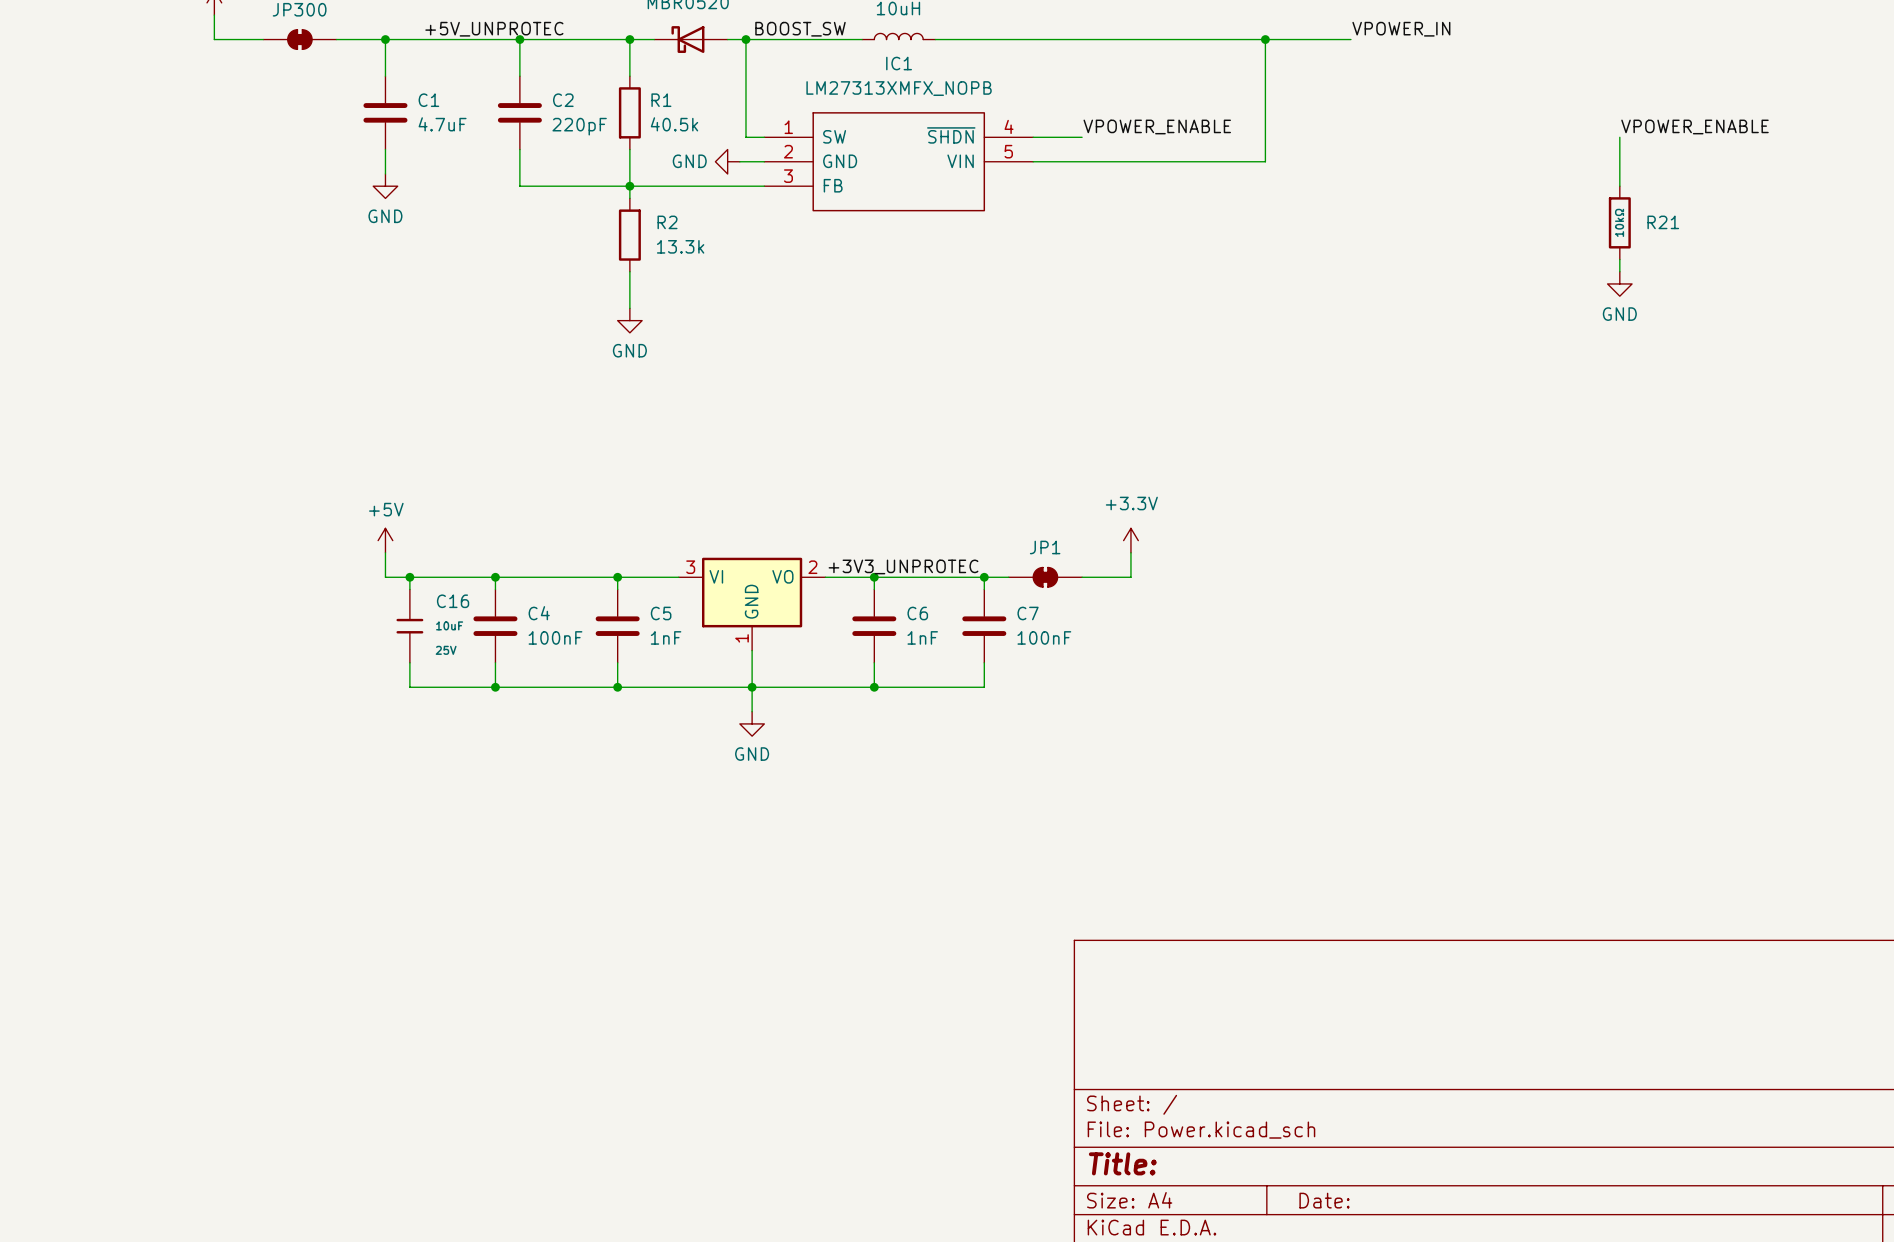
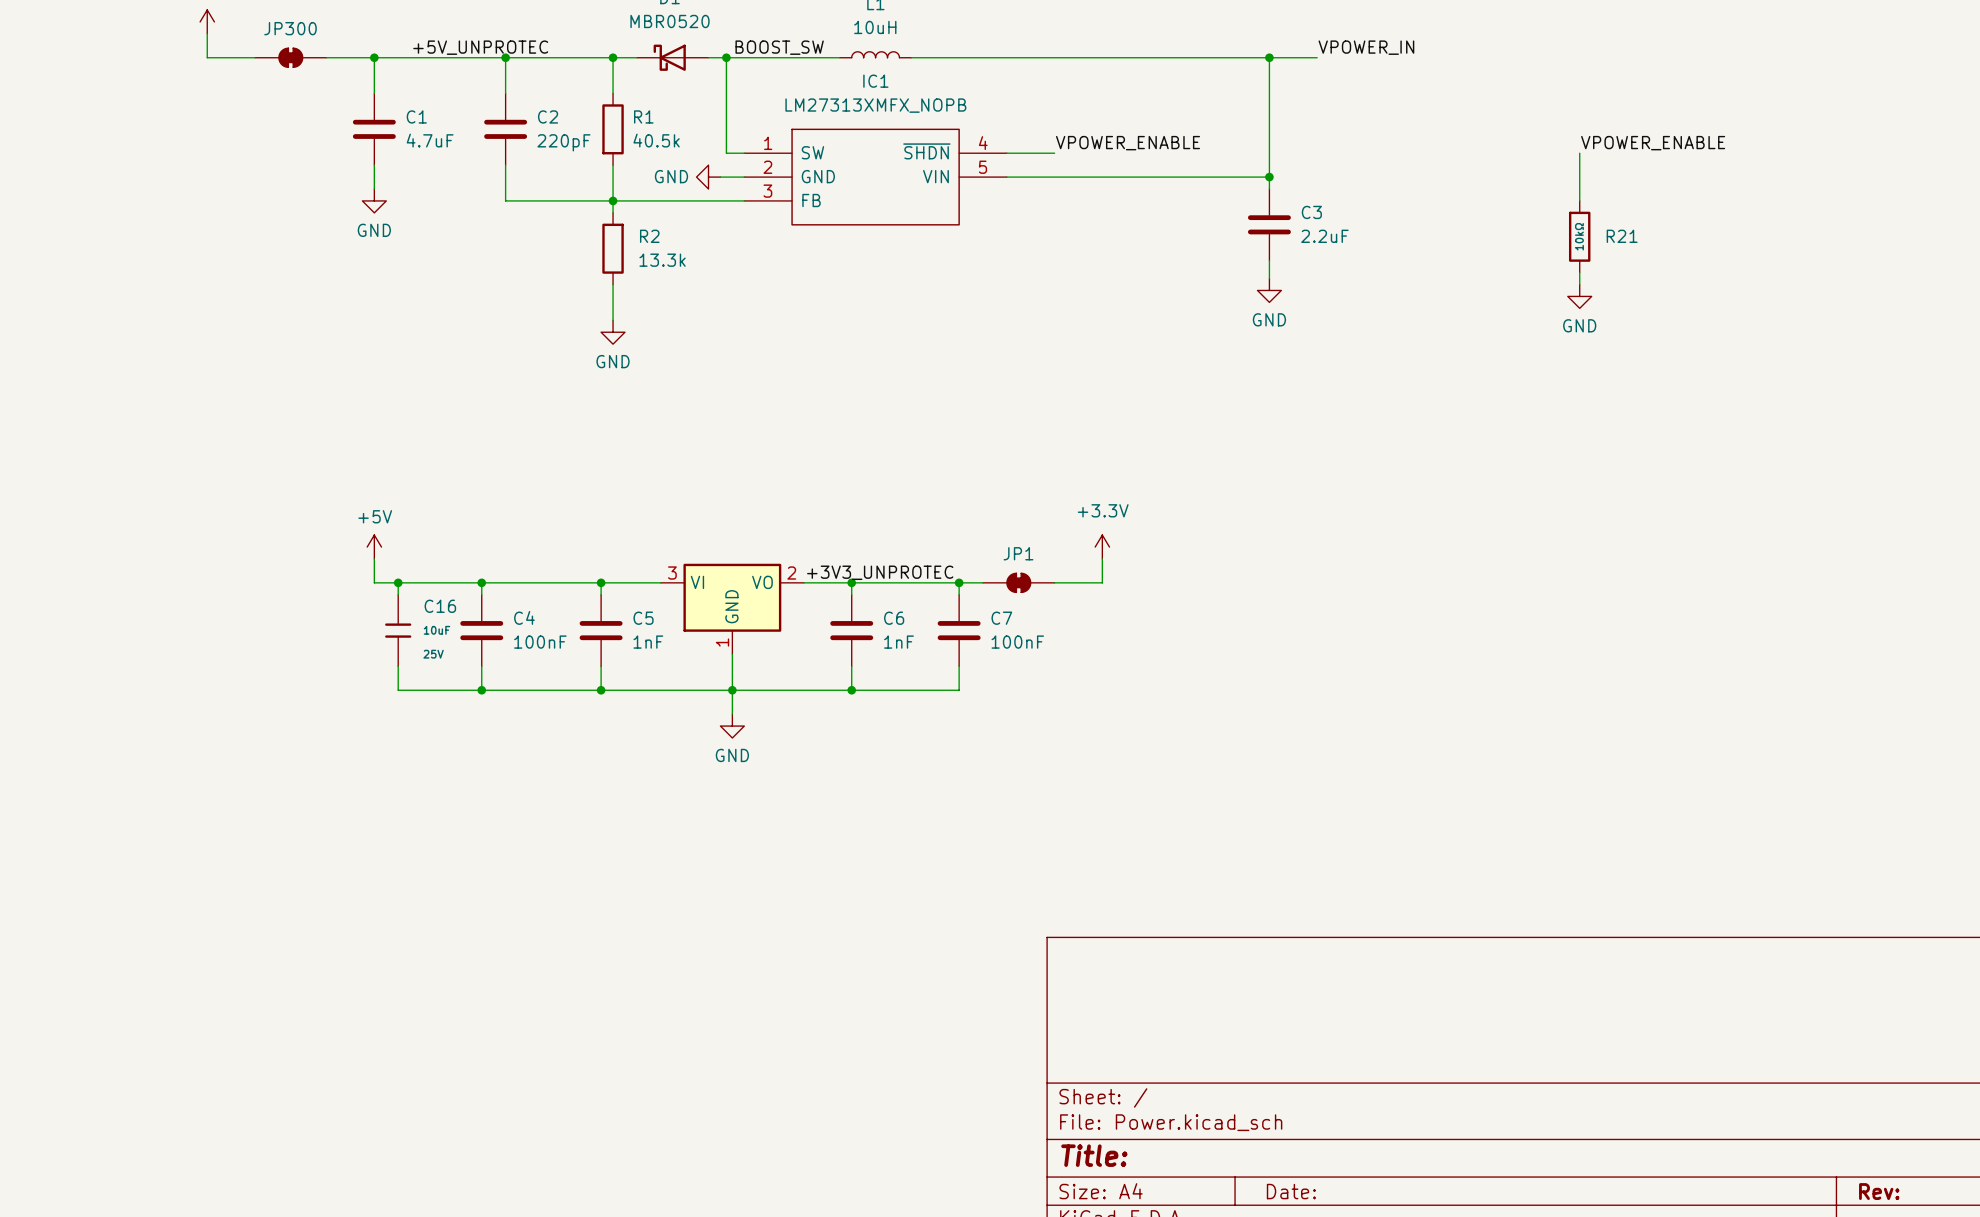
wire: (1265, 39) (1265, 161) -> (1269, 177) (1233, 177)
junction position: (1265, 39) -> (1269, 57)
wire: none -> (1269, 57) (1269, 189)
junction: none -> (1269, 177)
C3: none -> 2.2uF (1269, 224)
wire: none -> (1269, 260) (1269, 278)
power symbol: none -> GND (1269, 290)

